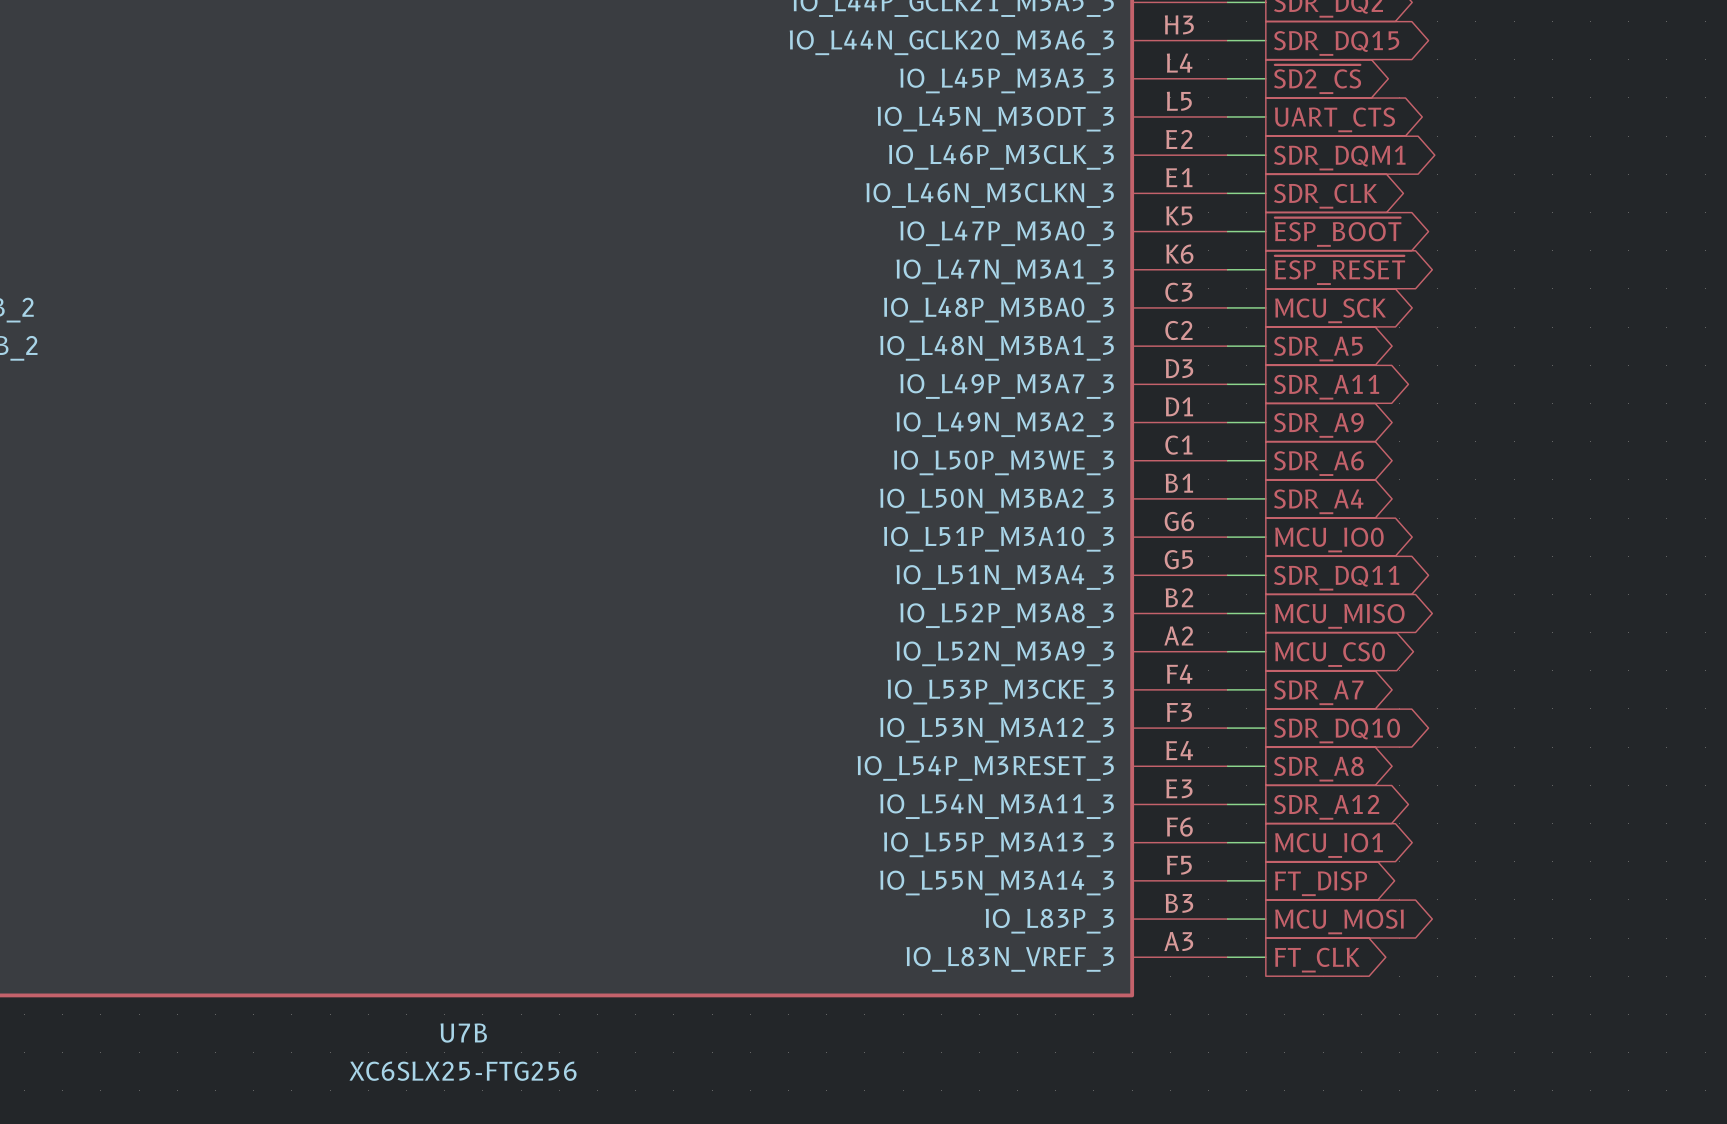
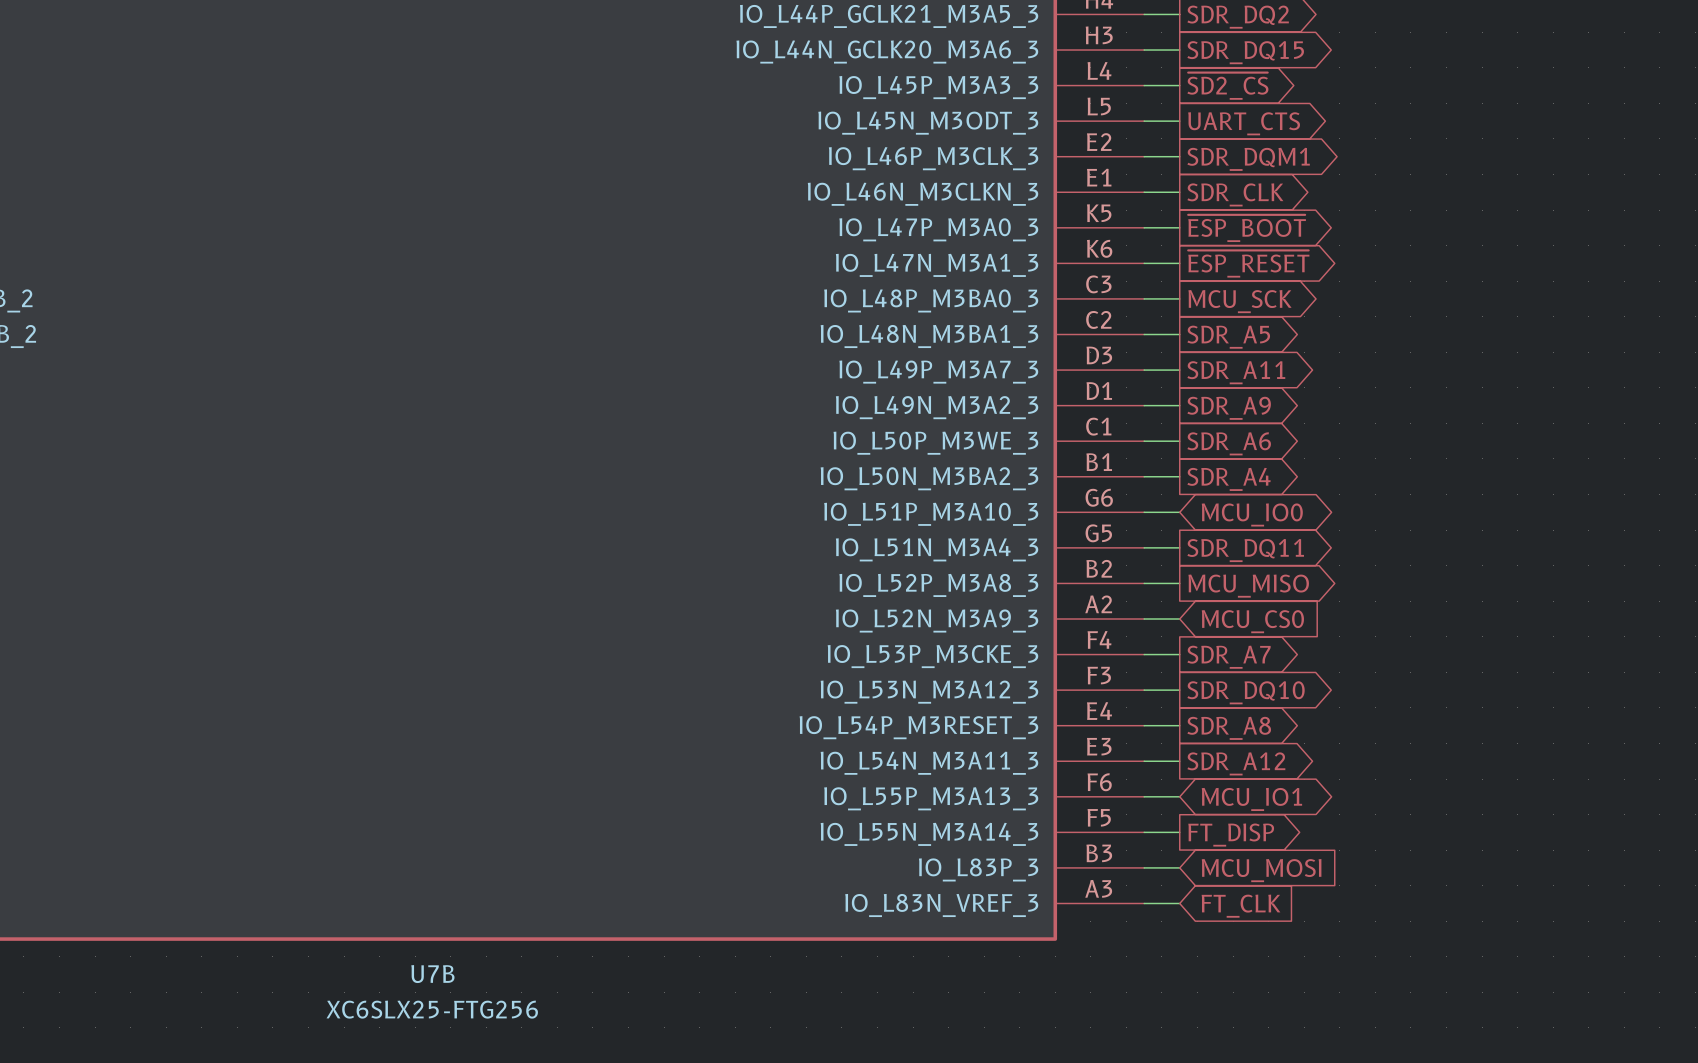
global label shape: output (1329, 539) -> bidirectional (1252, 514)
global label shape: output (1330, 654) -> input (1252, 621)
global label shape: output (1329, 845) -> bidirectional (1251, 799)
global label shape: output (1339, 921) -> input (1261, 870)
global label shape: output (1317, 960) -> input (1240, 906)

